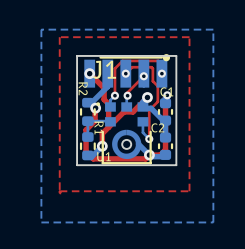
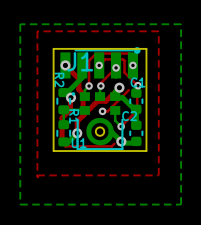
top track: (157, 86) (157, 101) (149, 110) (149, 139) -> (129, 77) (137, 85) (137, 110) (121, 126)
top track: (167, 95) (165, 97) (165, 149) (160, 155) (149, 155) (145, 158) (93, 158) (86, 151) -> (114, 143) (111, 146) (65, 146) (62, 143) (62, 138)
top track: none -> (128, 90) (107, 111) (102, 111)
via: none -> (102, 111)

